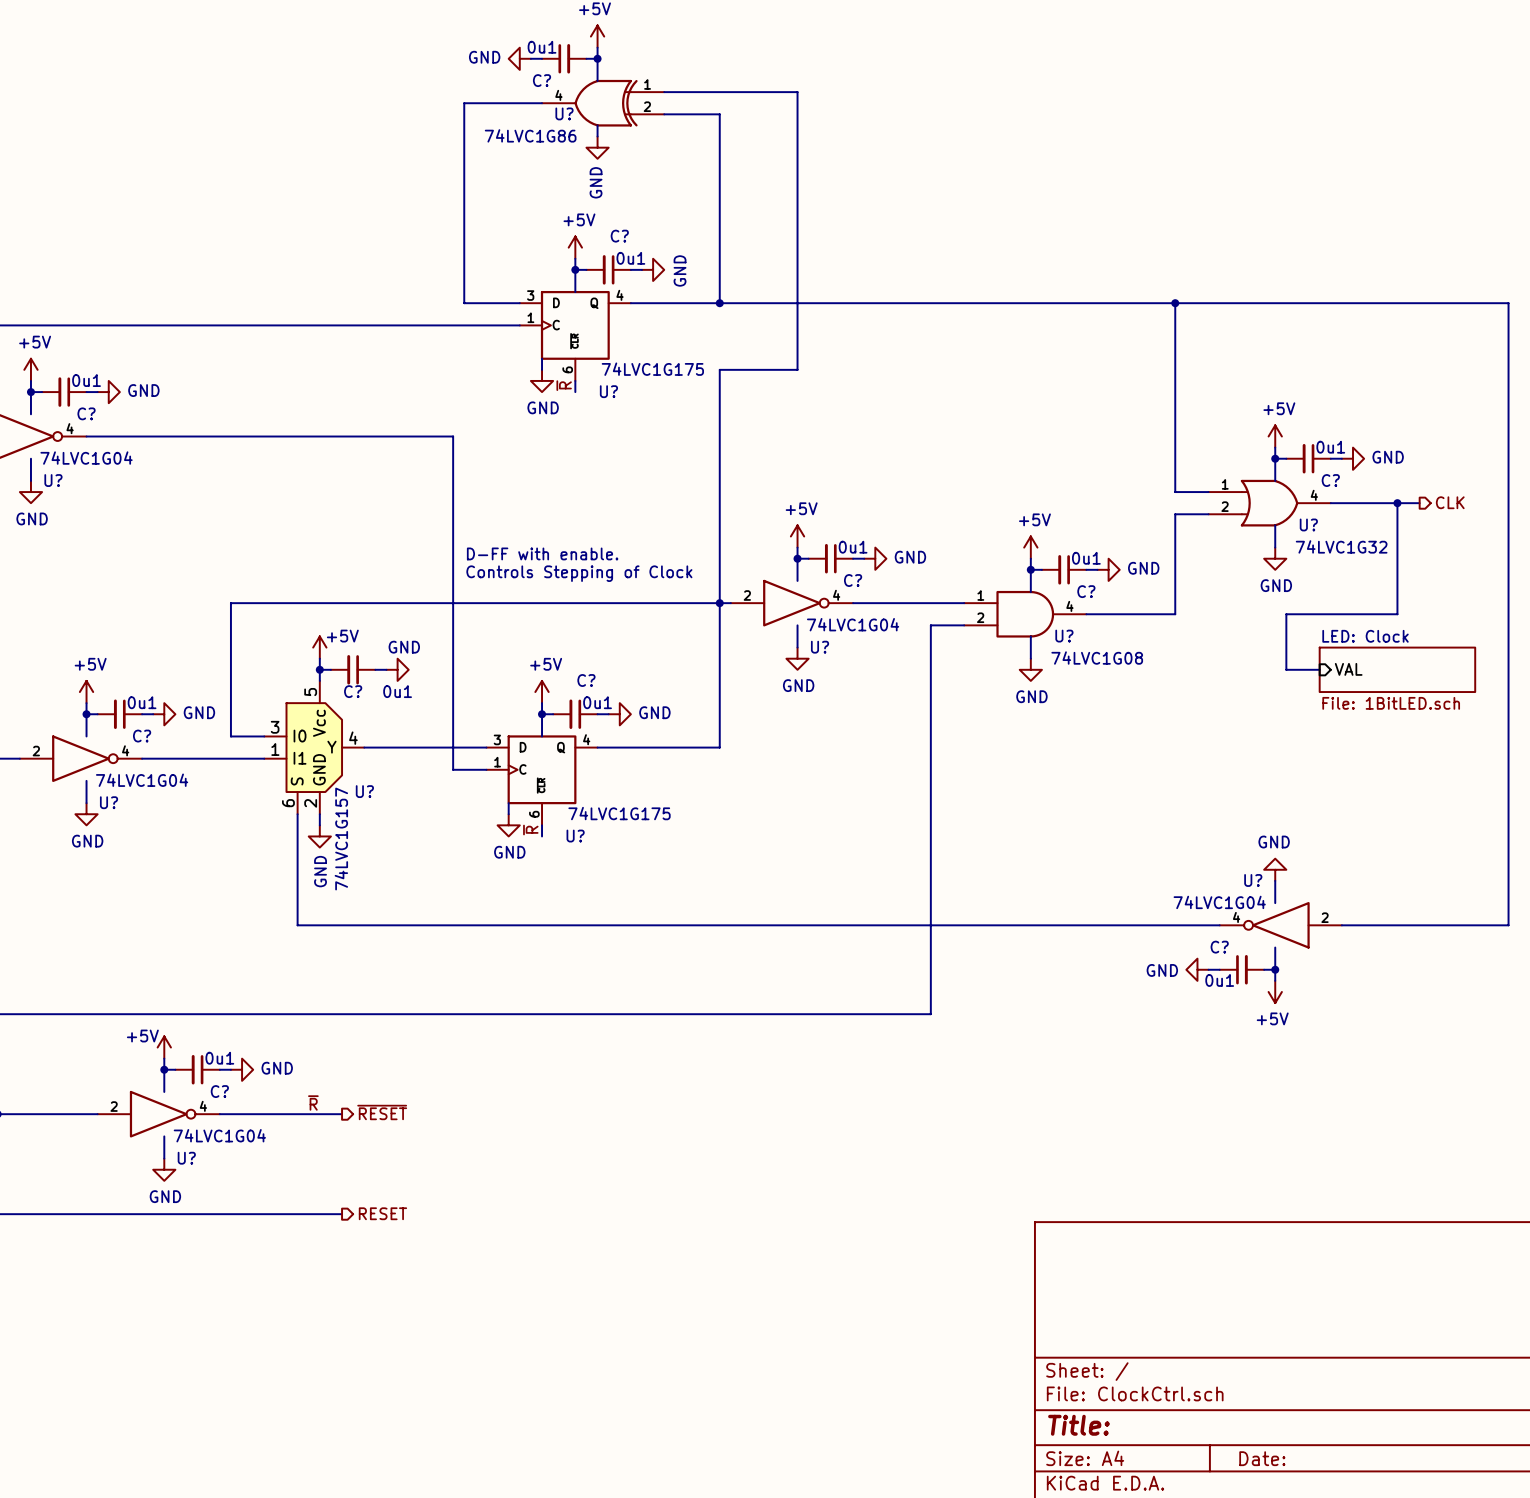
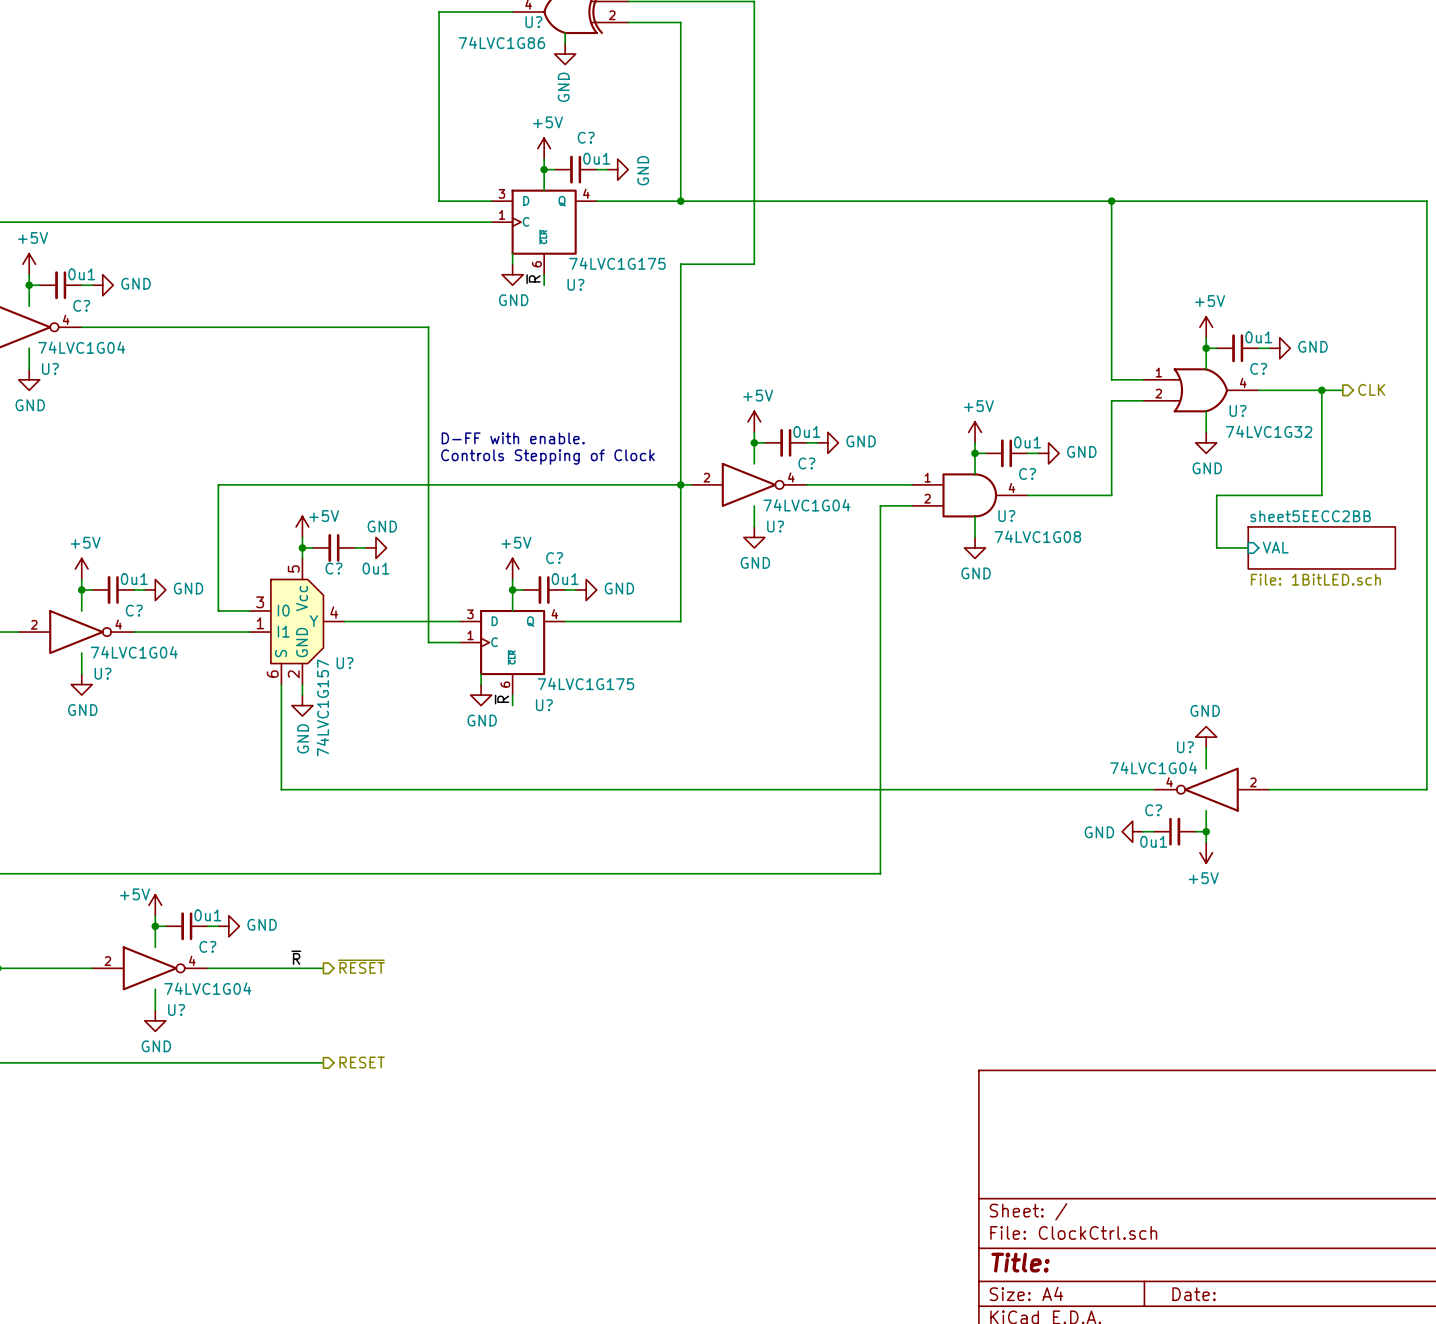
sheet sheet5EECC2BB name: LED: Clock (1365, 636) -> sheet5EECC2BB (1310, 516)

